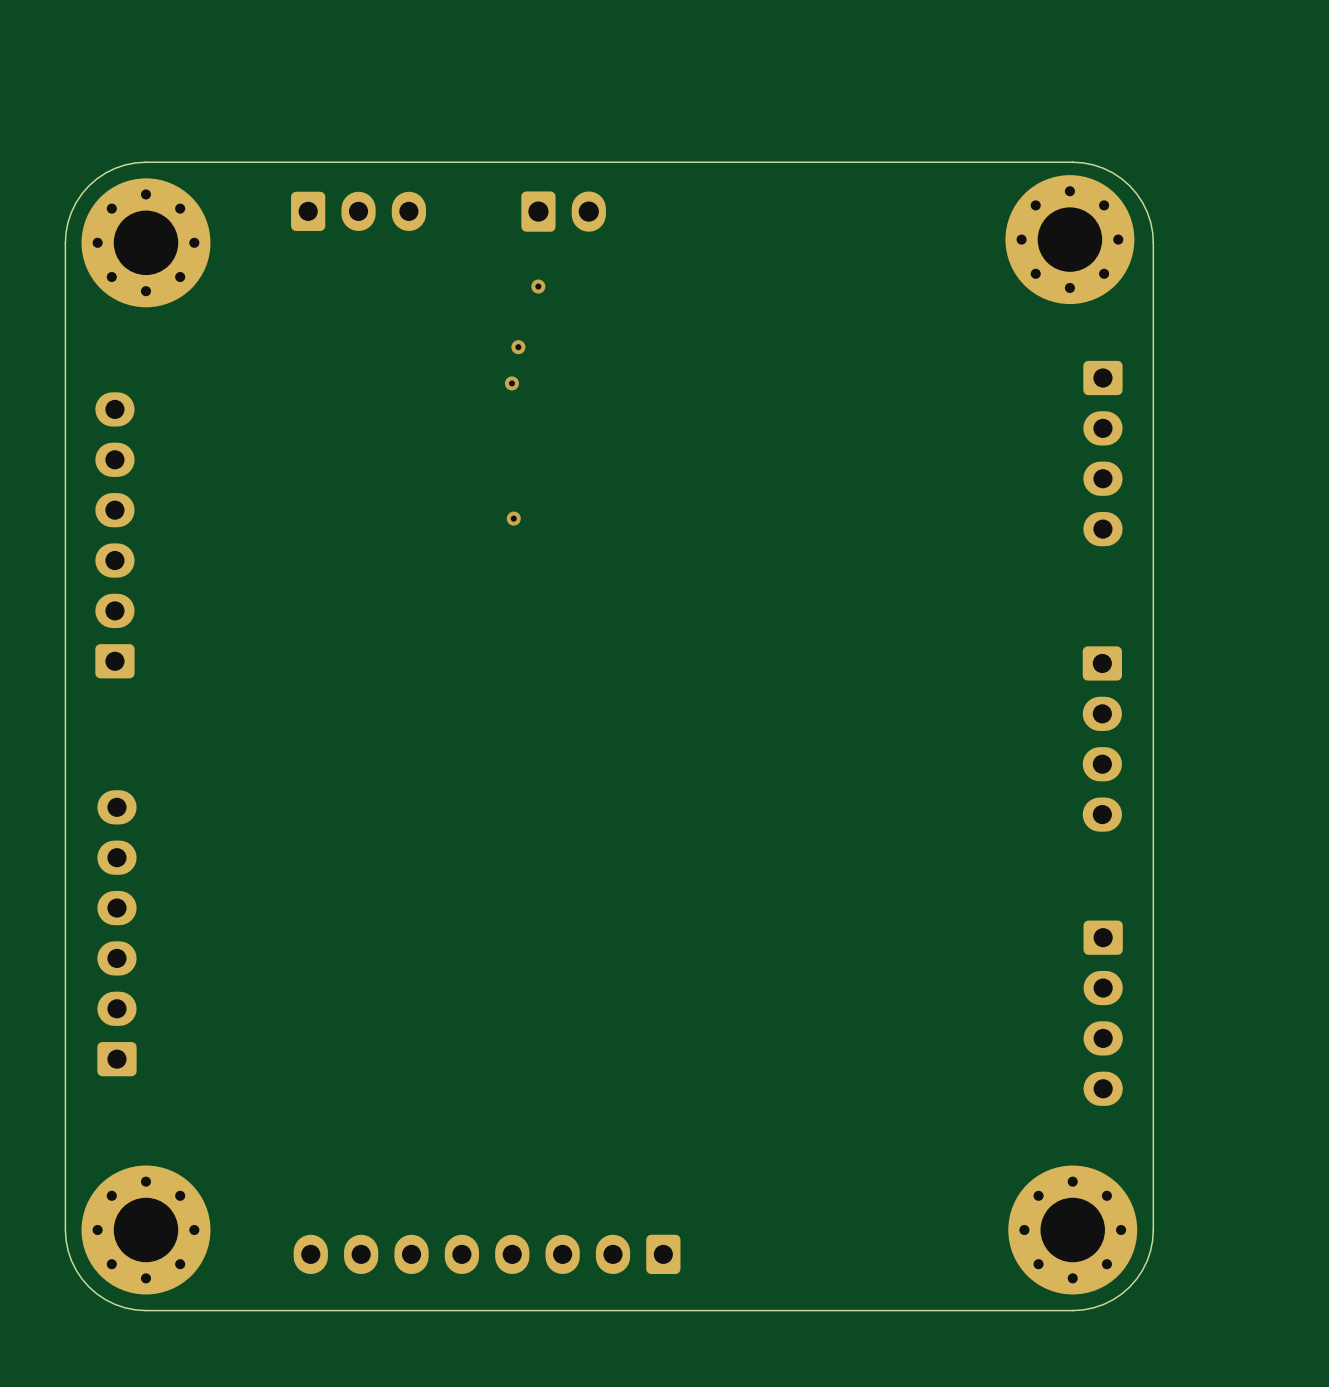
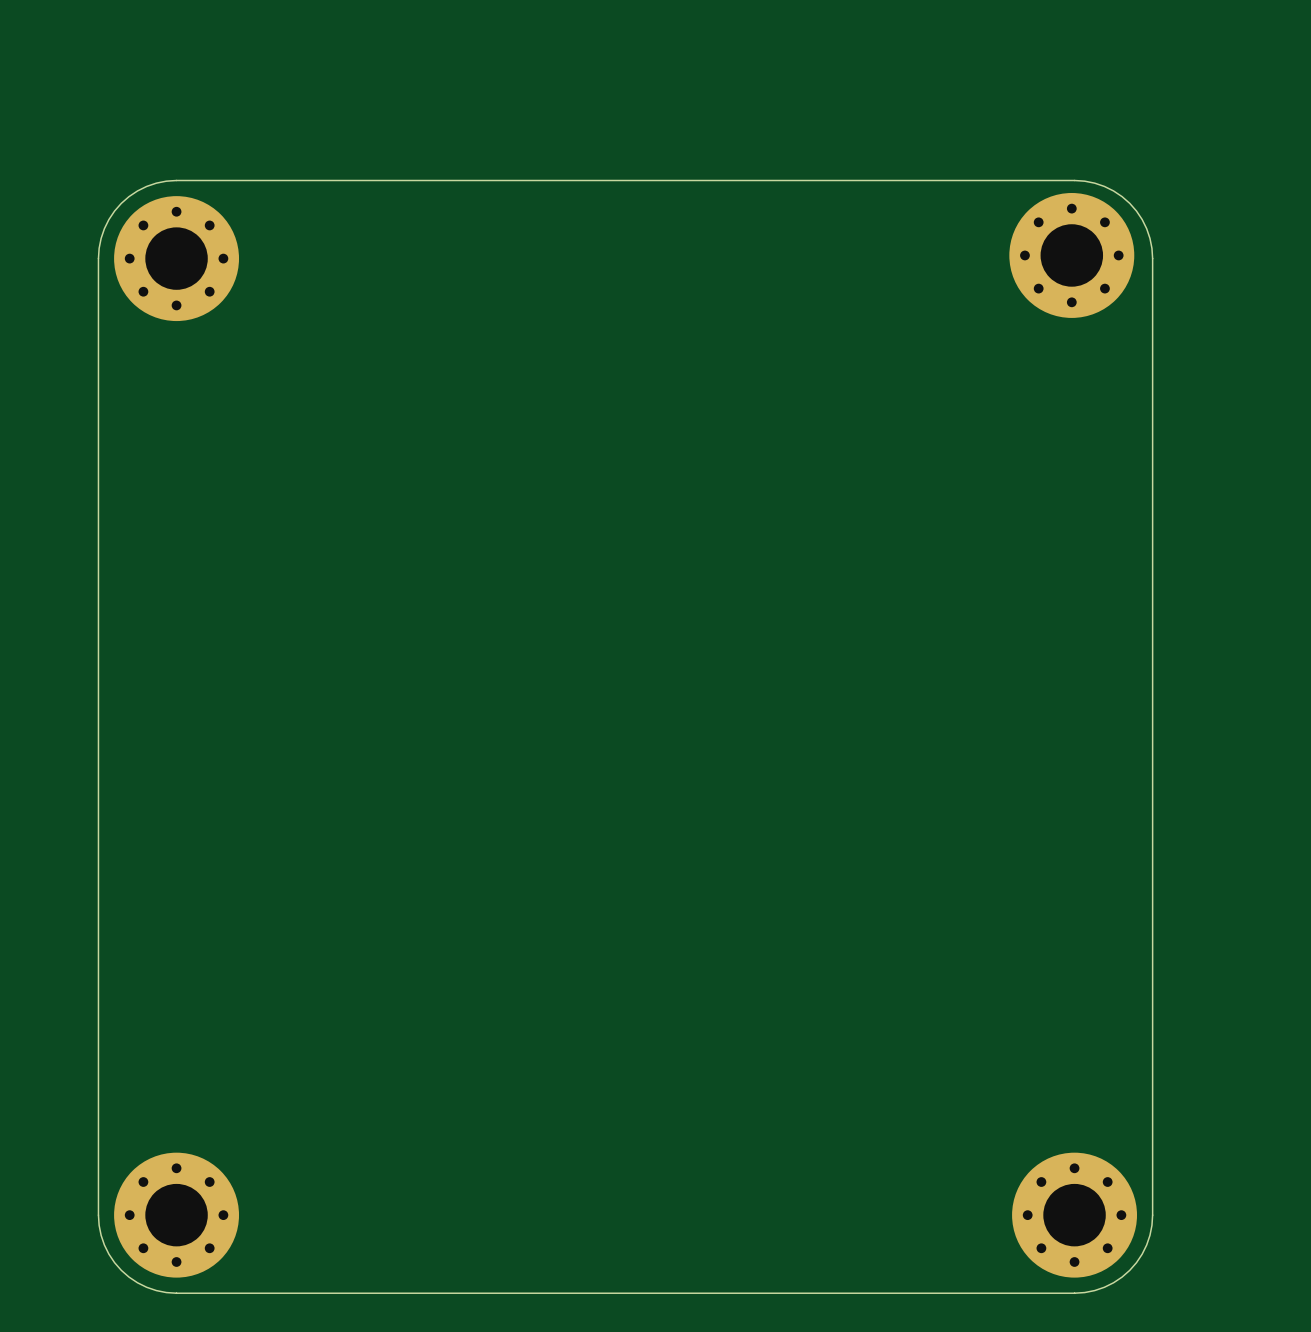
part: (358, 211) -> none
part: (563, 211) -> none
via: (538, 286) -> none
via: (518, 347) -> none
via: (511, 383) -> none
part: (1102, 453) -> none
via: (513, 518) -> none
part: (114, 535) -> none
part: (1102, 739) -> none
part: (116, 933) -> none
part: (1103, 1013) -> none
part: (487, 1254) -> none

